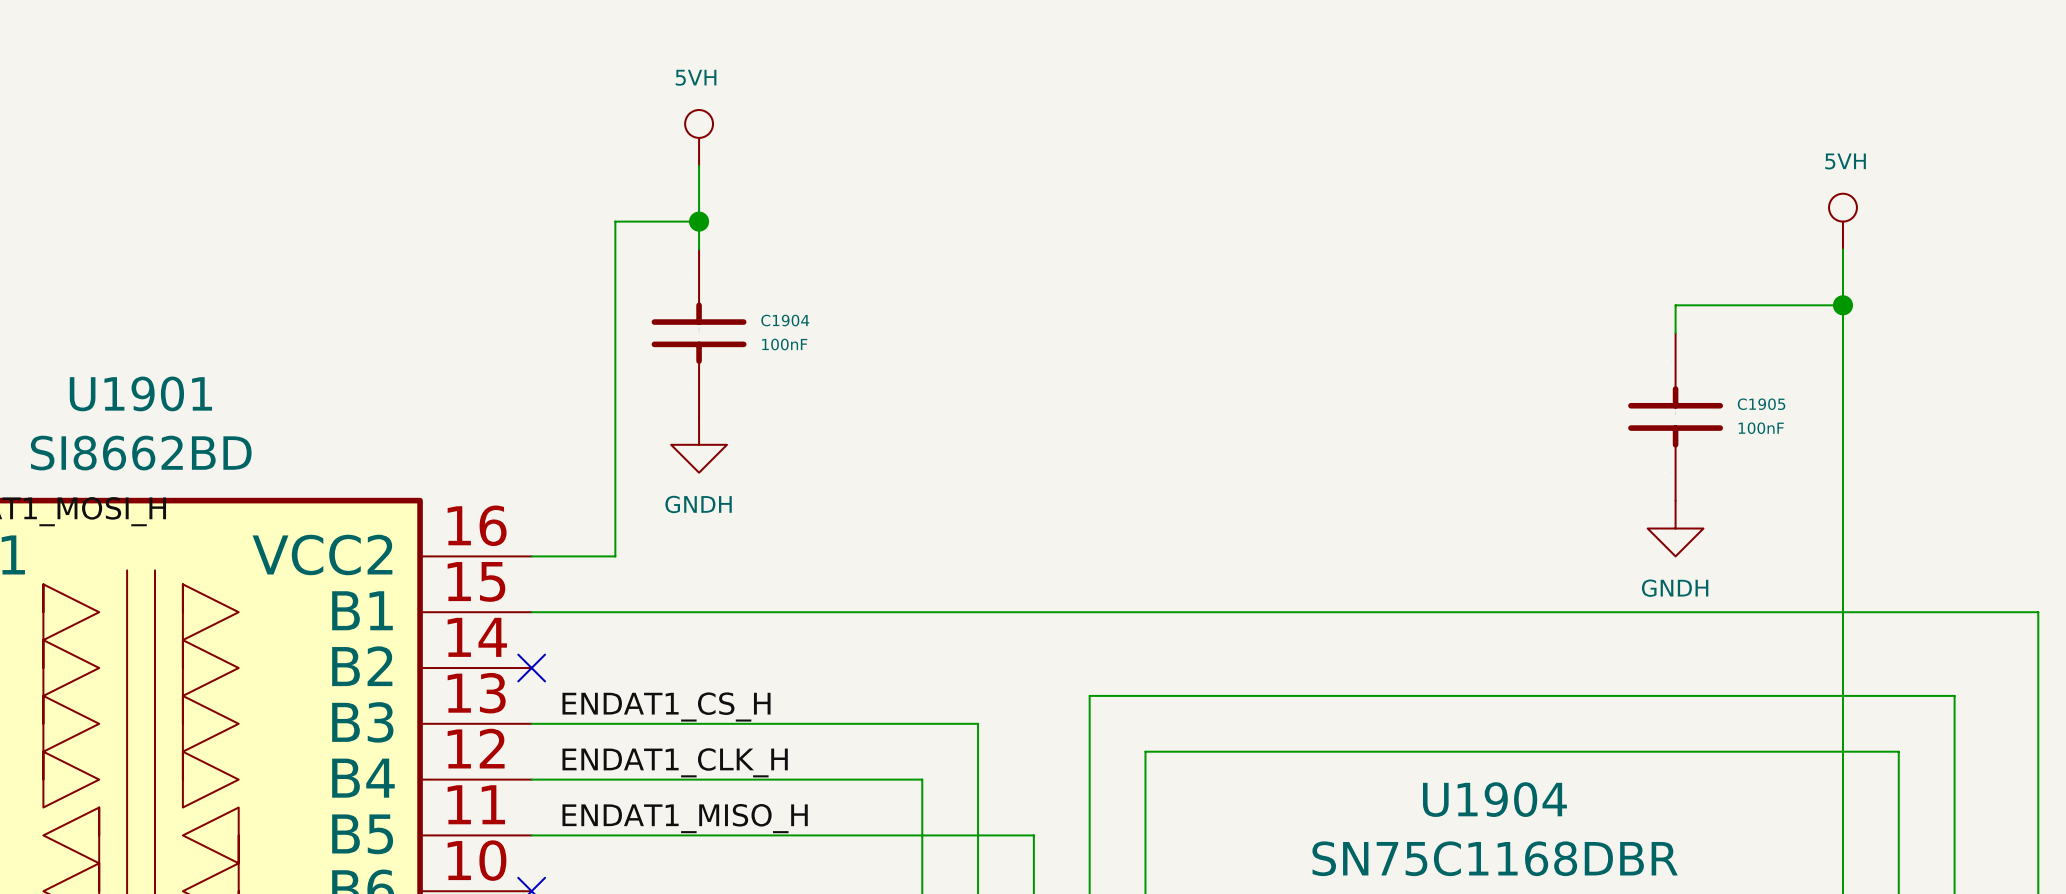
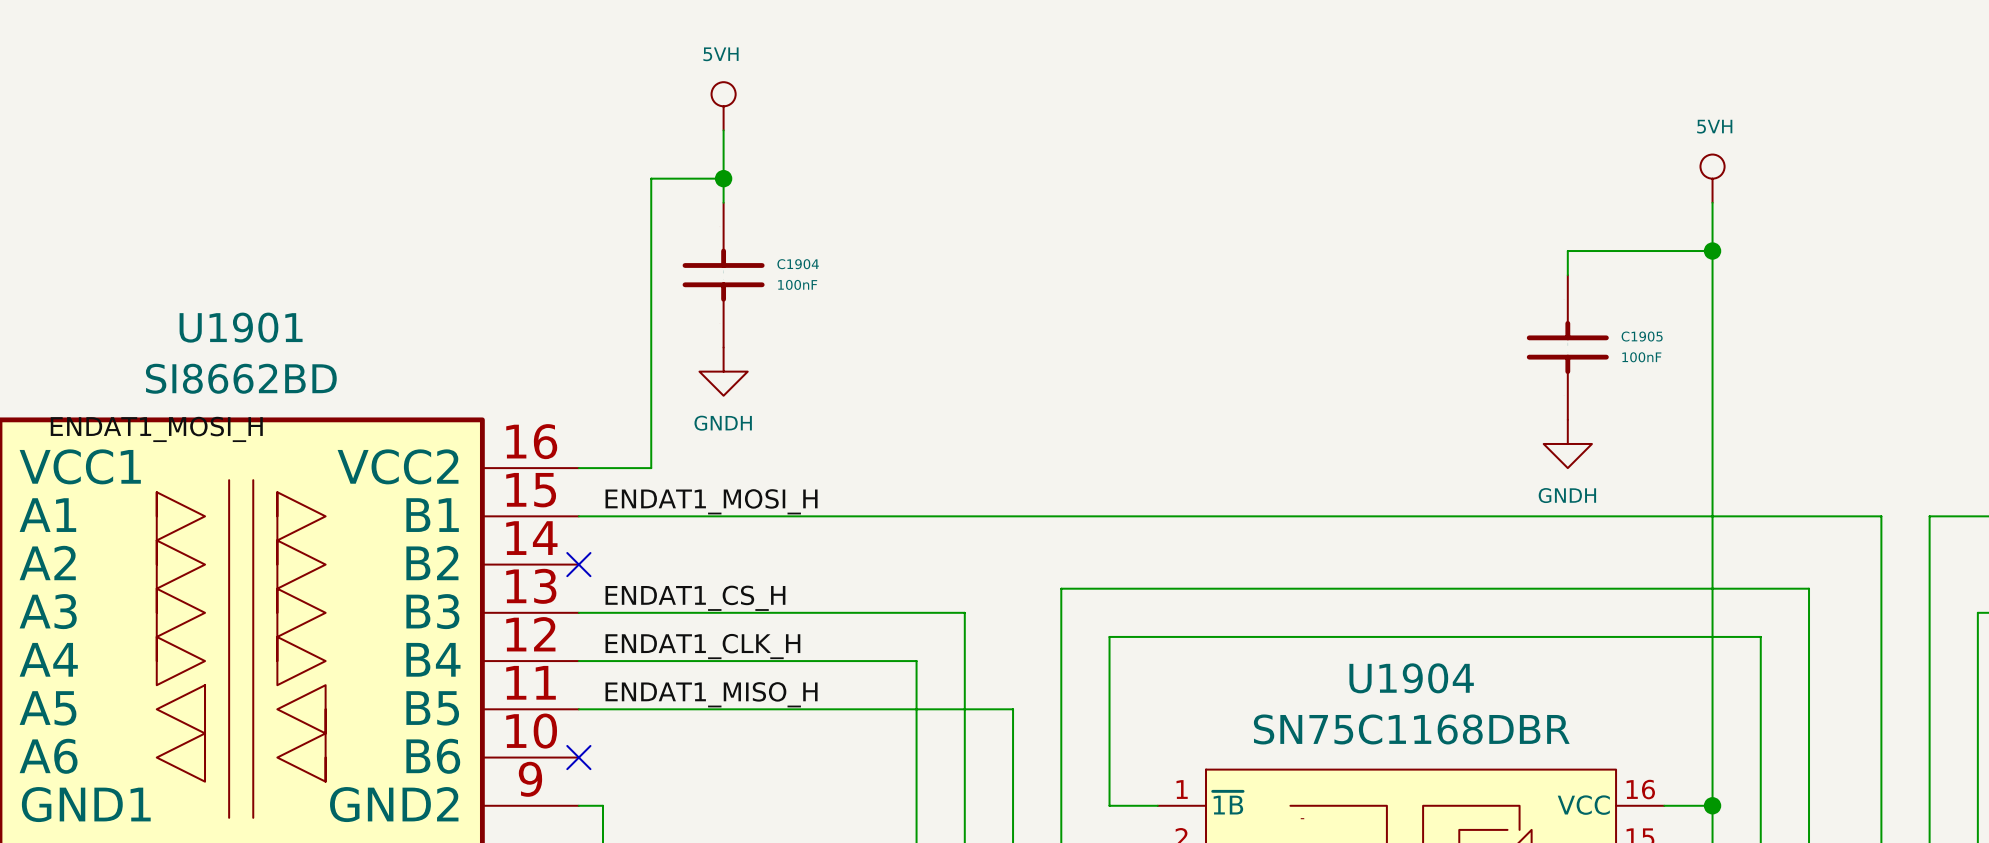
label: none -> ENDAT1_MOSI_H (711, 501)

